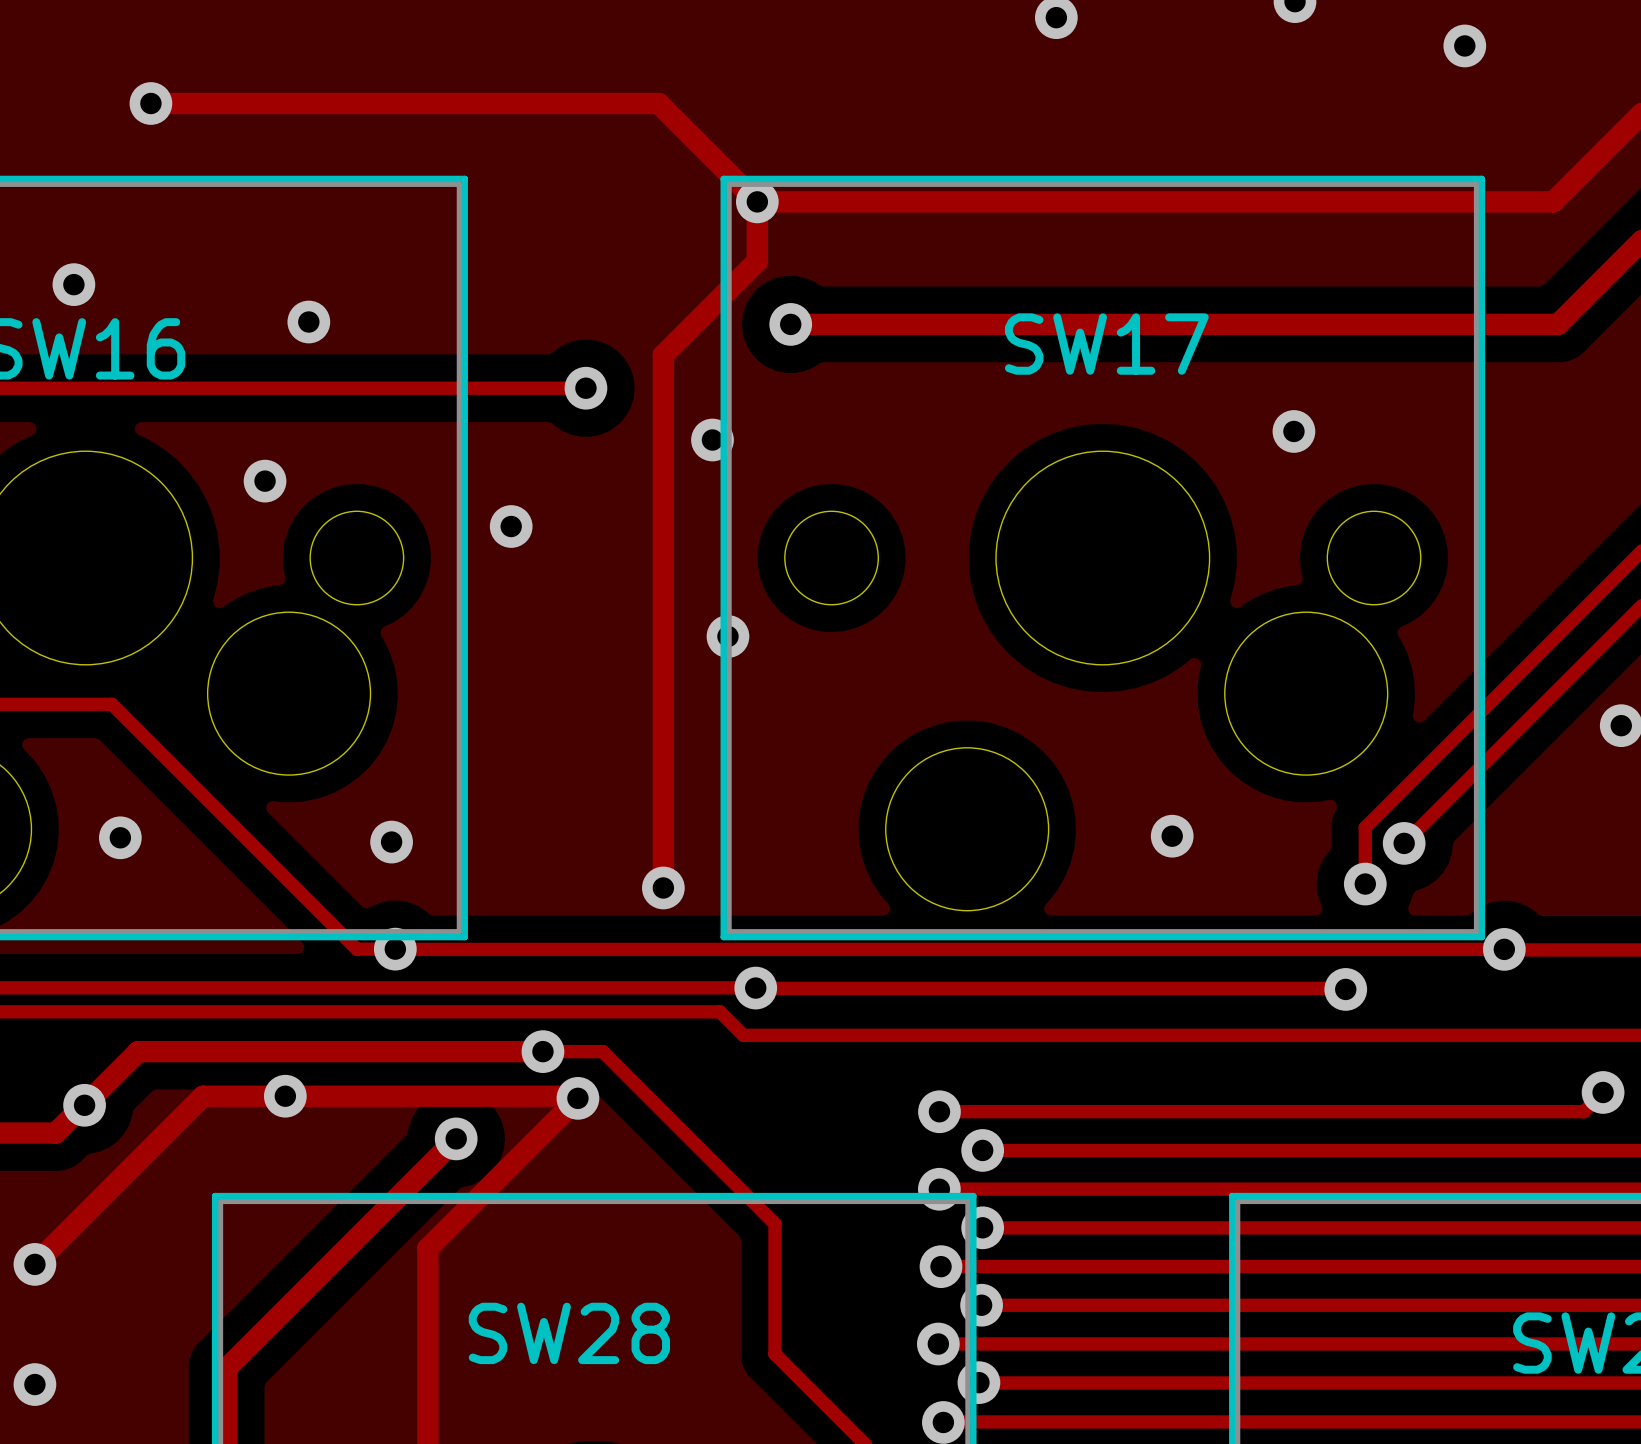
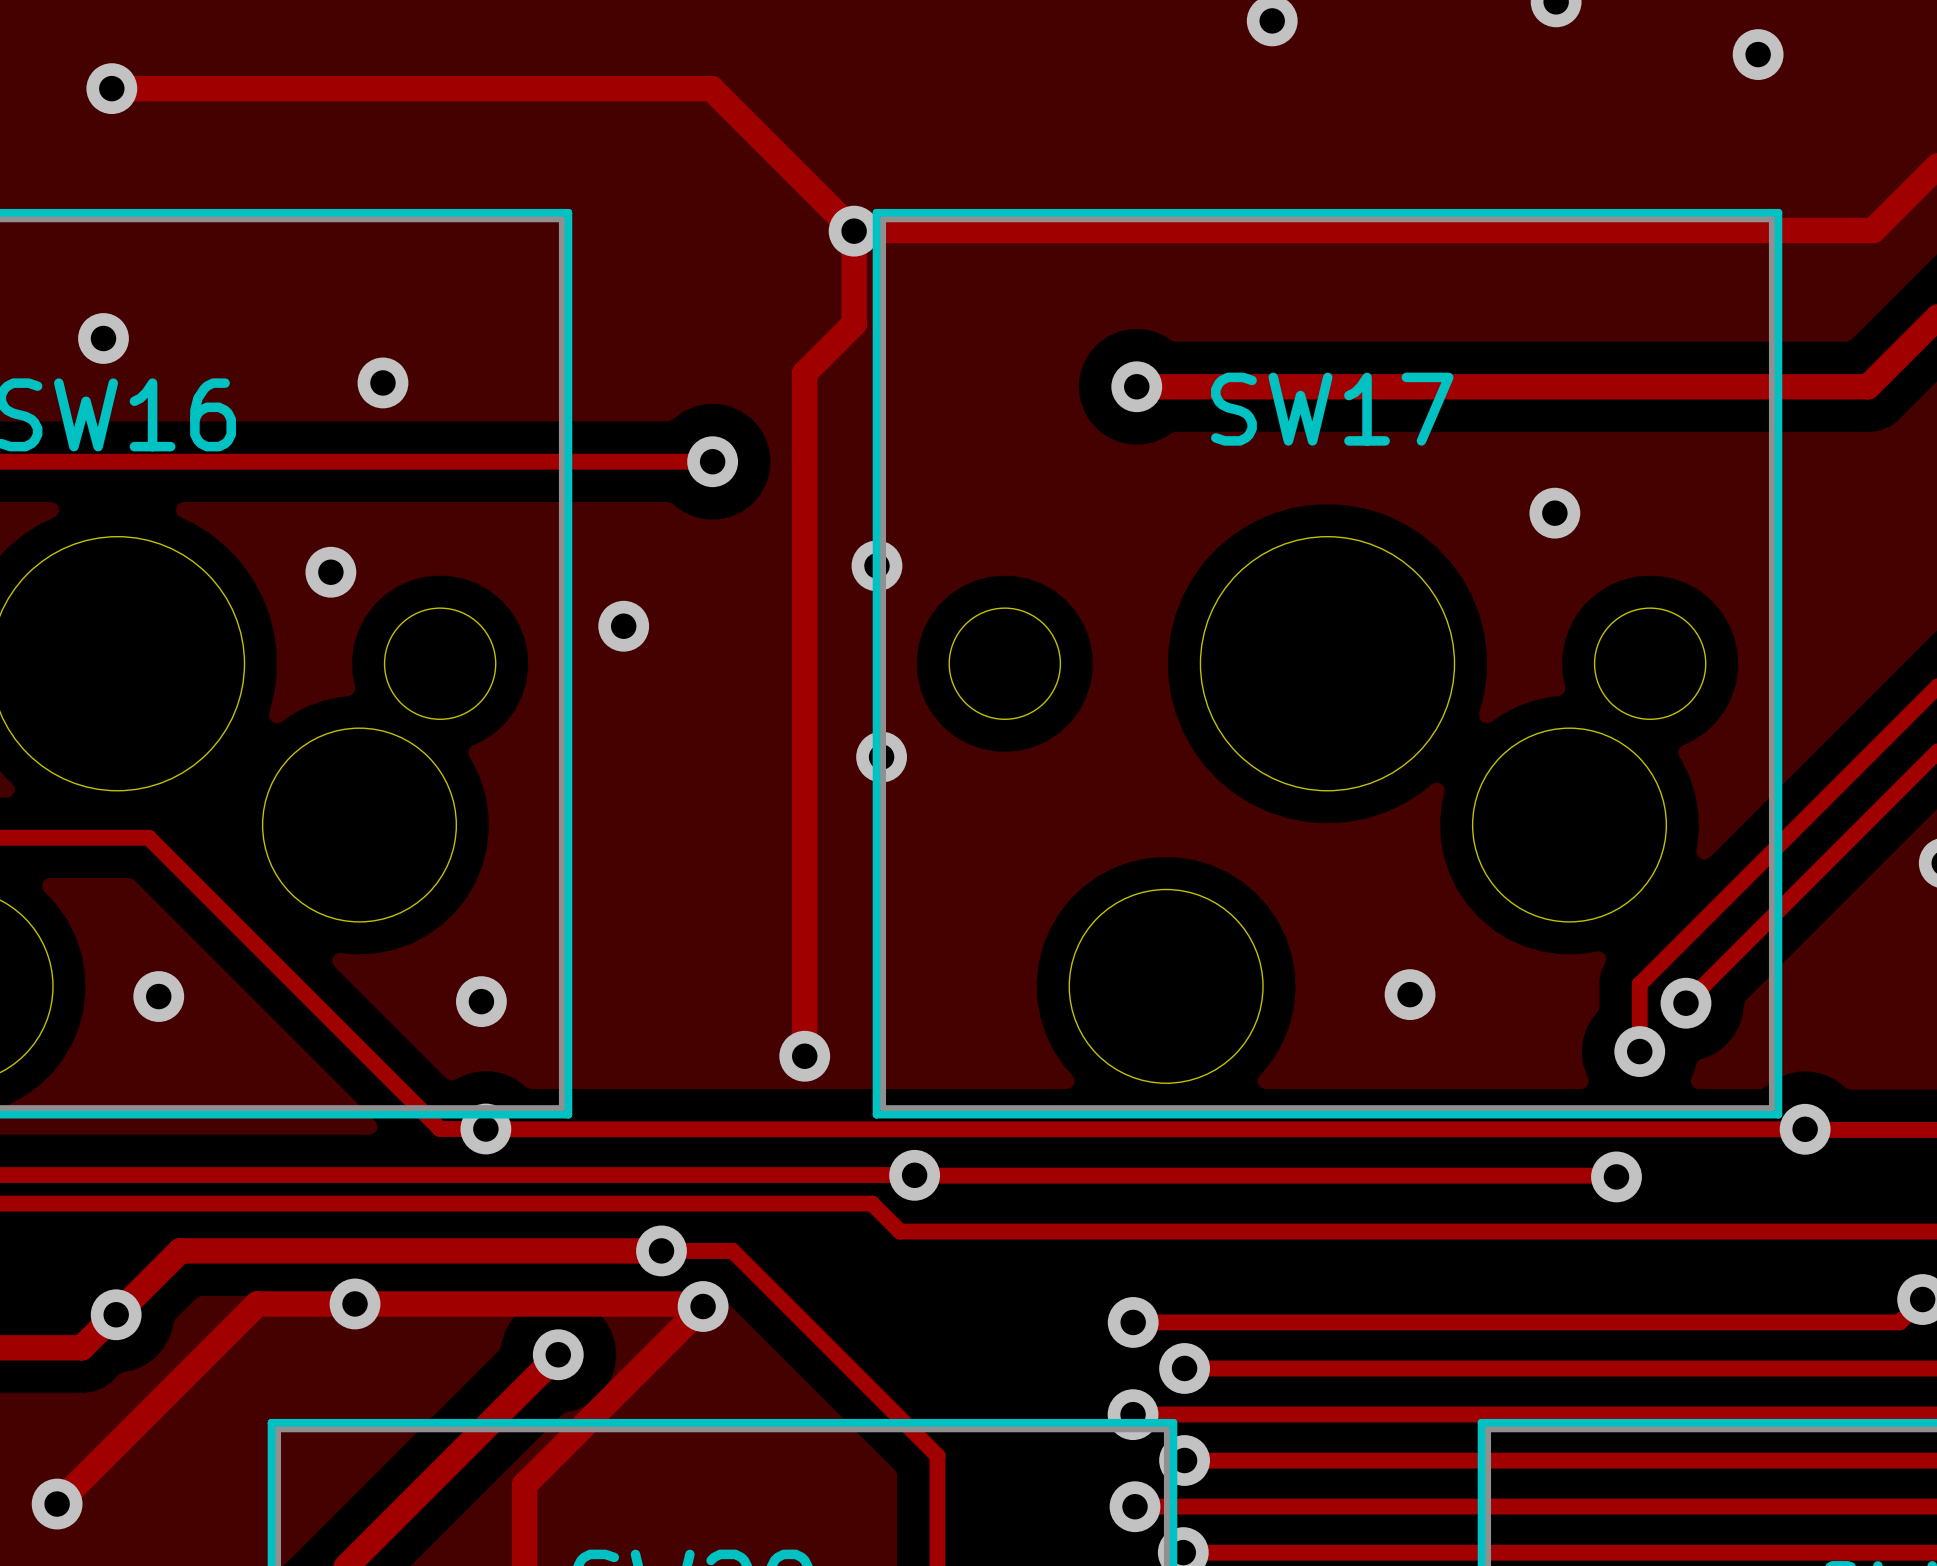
track: (150, 103) (658, 103) (757, 201) -> none
via position: (150, 103) -> (111, 88)
track: (1561, 193) (1553, 201) (757, 201) -> (1873, 230) (854, 230)
track: (757, 201) (757, 261) (663, 355) -> (111, 88) (711, 88) (854, 231) (854, 323) (804, 373) (804, 422)
via position: (757, 201) -> (854, 231)
track: (790, 324) (1557, 324) -> (1136, 386) (1868, 385)
via: (790, 324) -> none
via: none -> (1136, 386)
via position: (712, 440) -> (876, 565)

